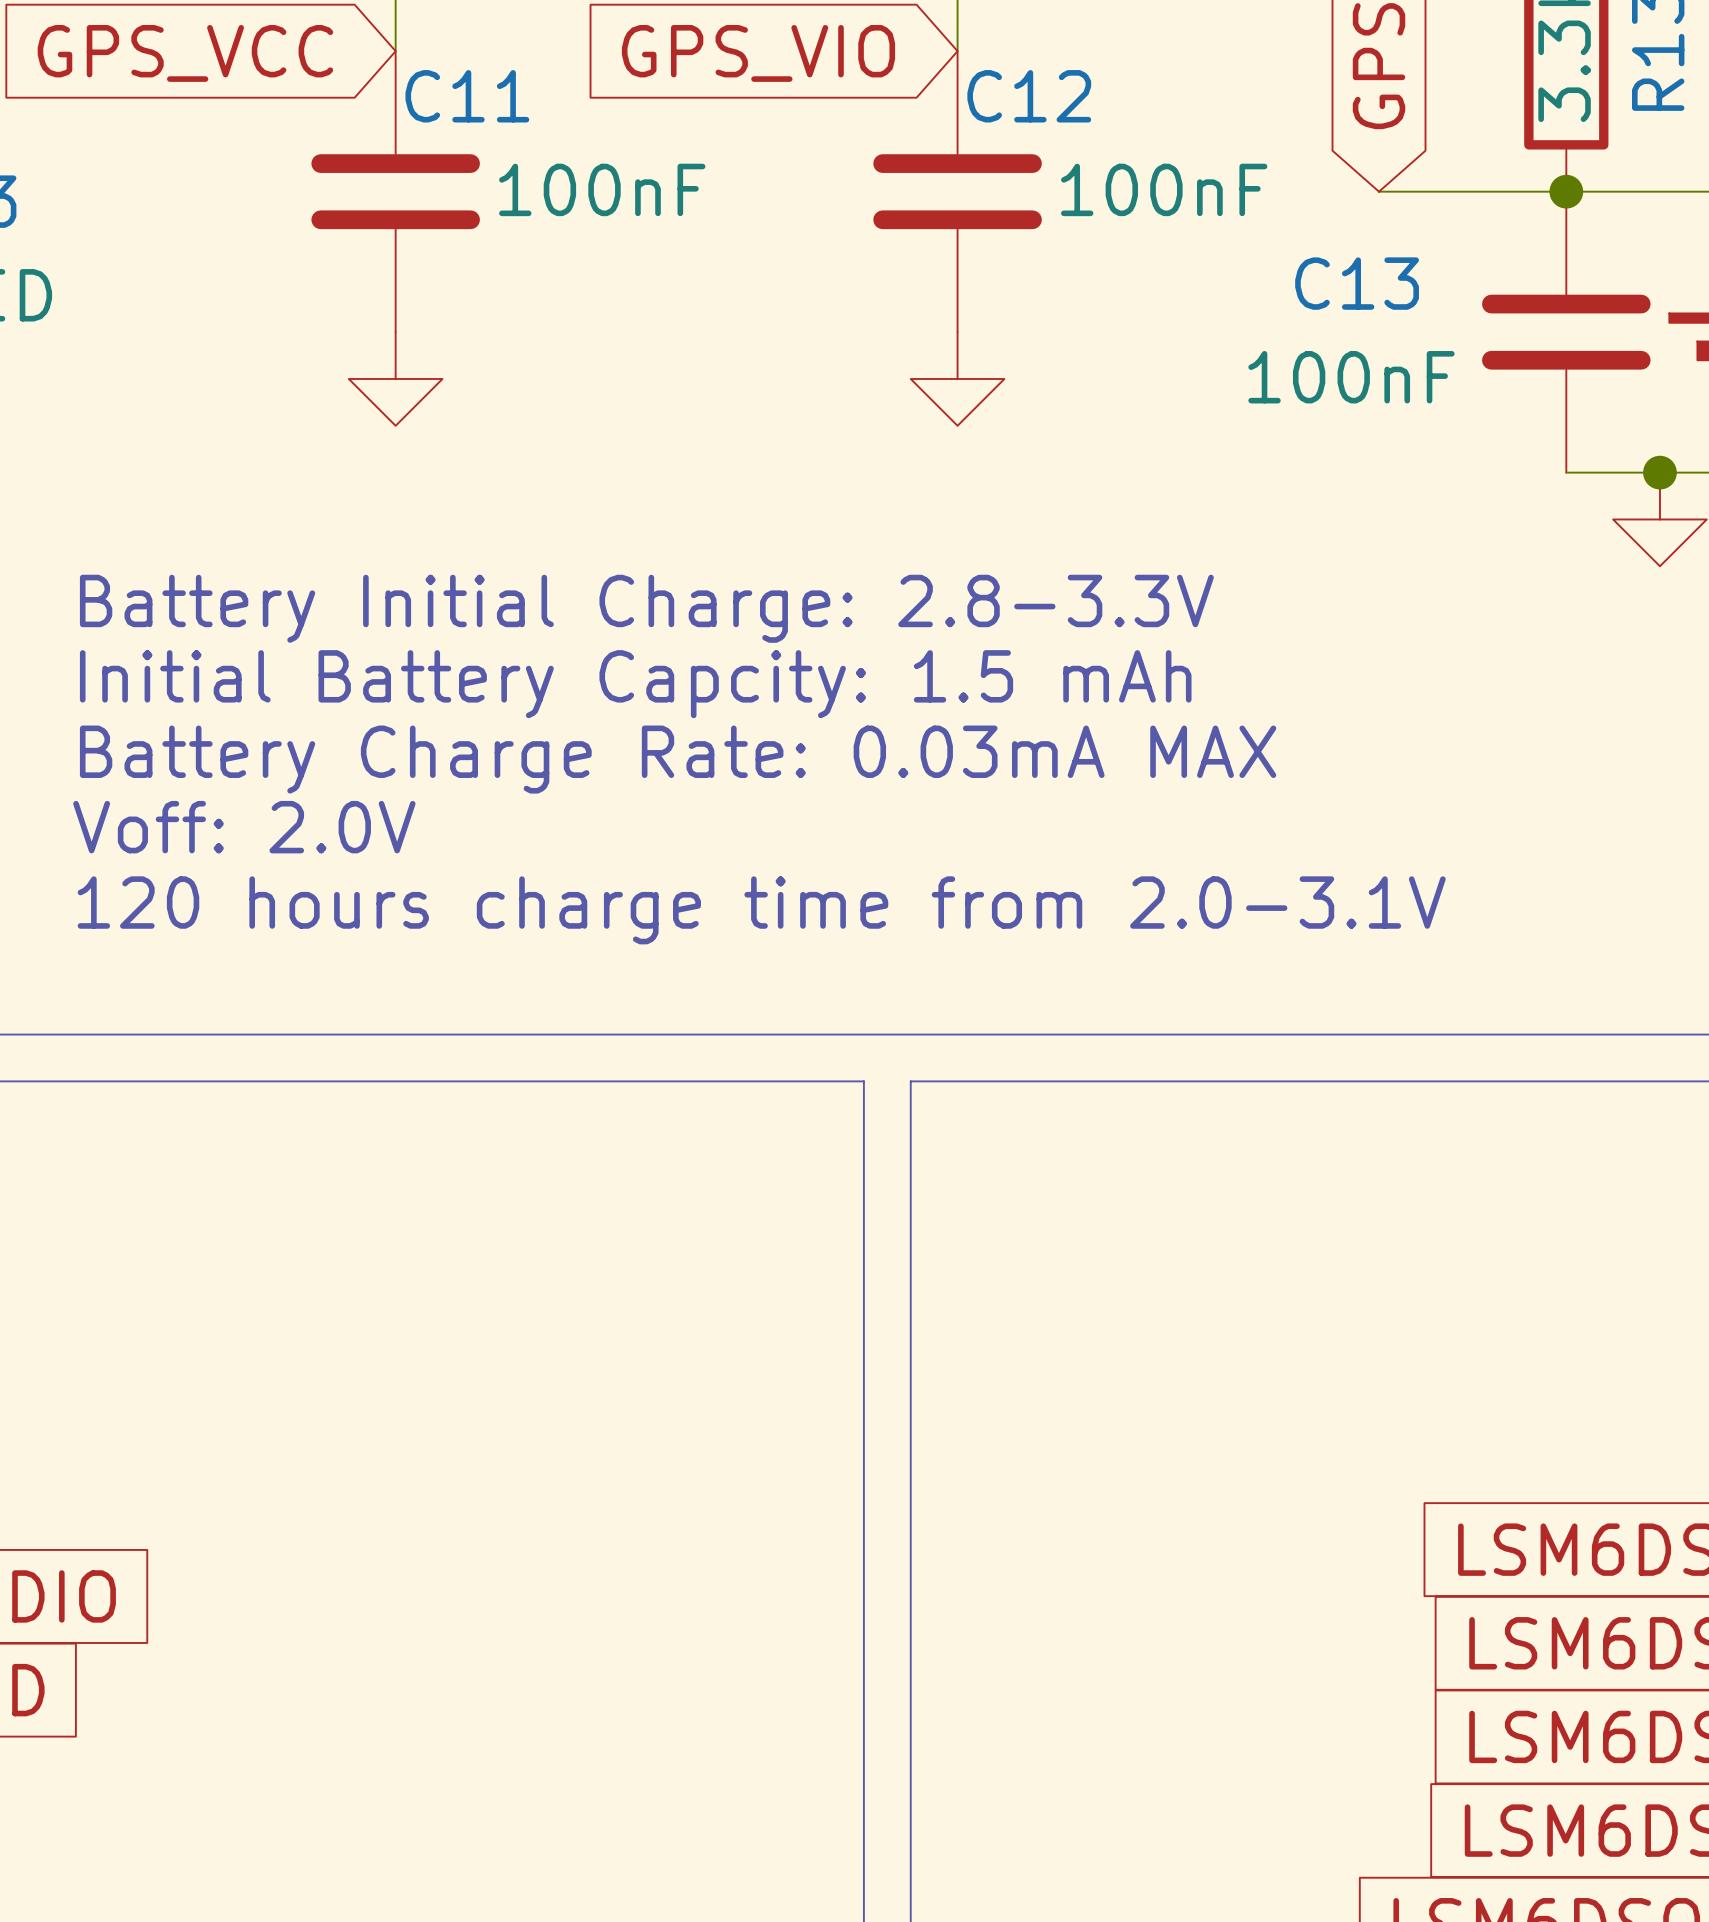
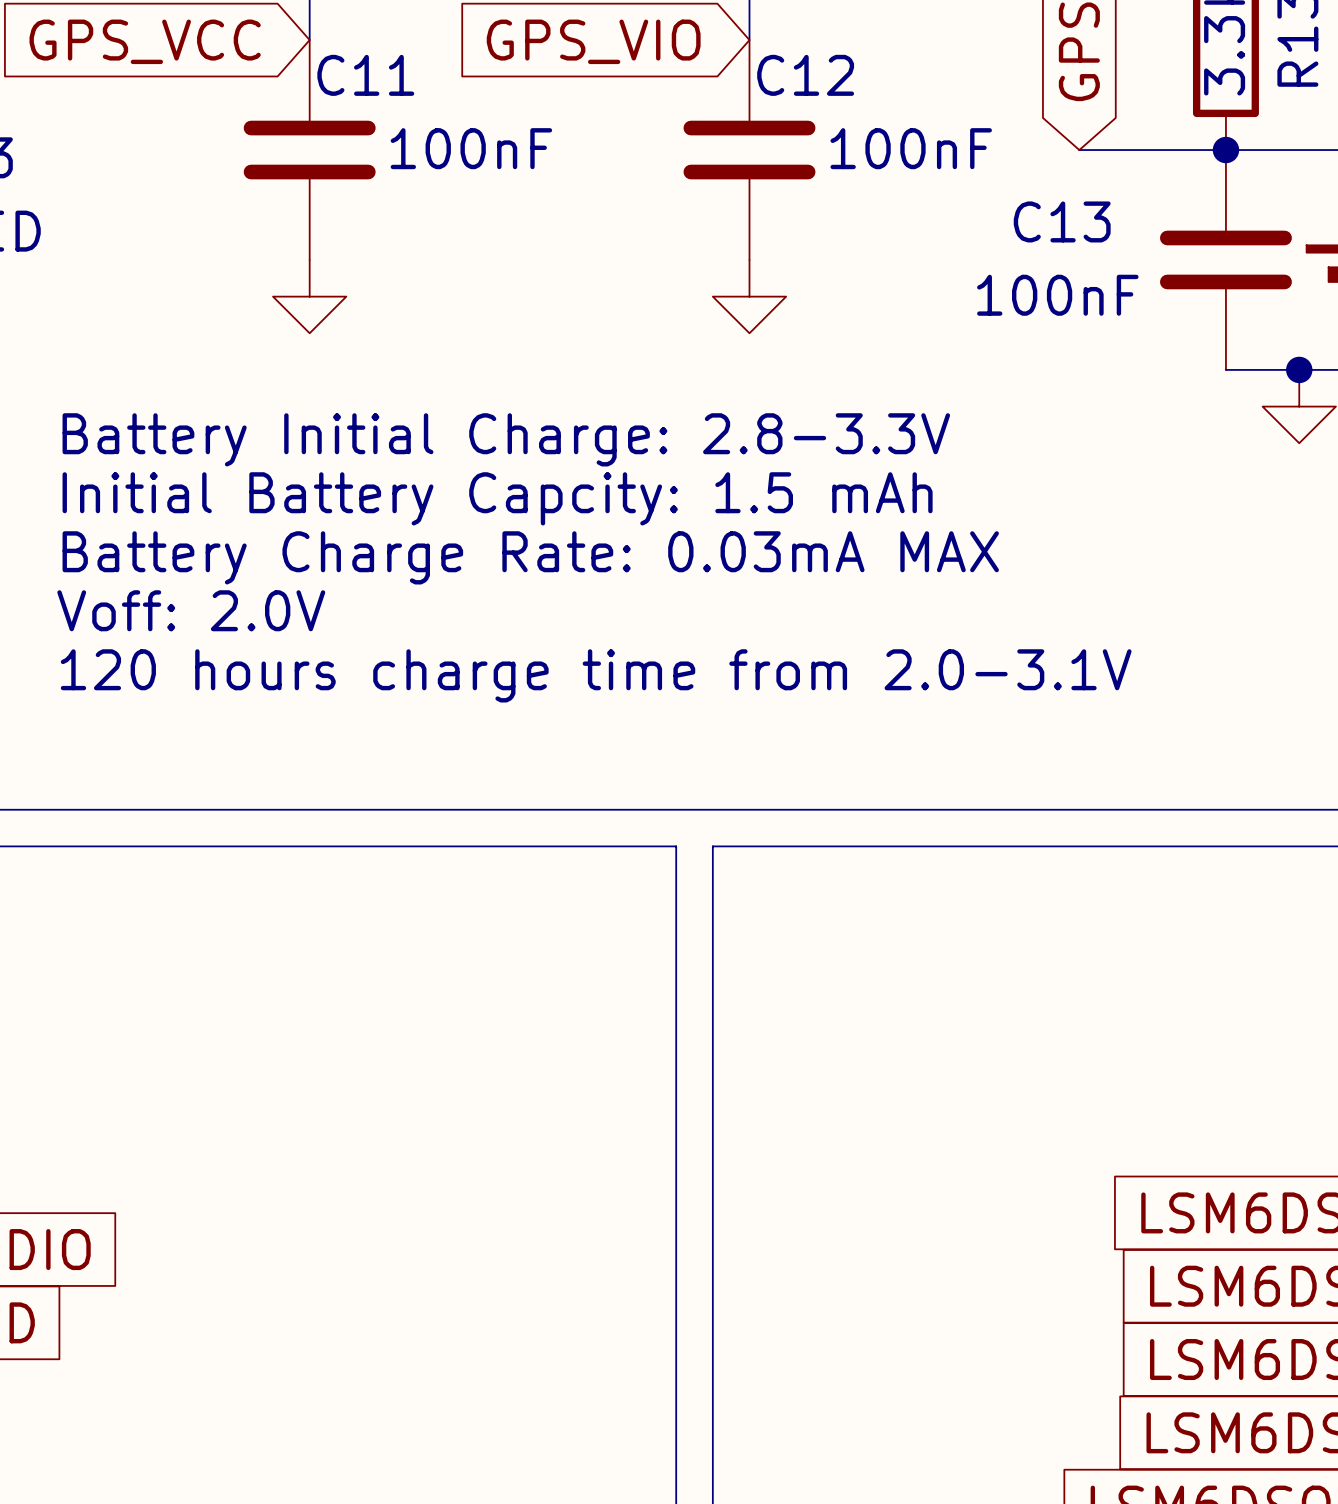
text position: Battery Initial Charge: 2.8-3.3V (646, 608) -> Battery Initial Charge: 2.8-3.3V (506, 439)
text position: Initial Battery Capcity: 1.5 mAh (635, 684) -> Initial Battery Capcity: 1.5 mAh (497, 498)
text position: Battery Charge Rate: 0.03mA MAX (678, 759) -> Battery Charge Rate: 0.03mA MAX (530, 557)
text position: Voff: 2.0V (244, 827) -> Voff: 2.0V (191, 610)
text position: 120 hours charge time from 2.0-3.1V (761, 910) -> 120 hours charge time from 2.0-3.1V (596, 675)

